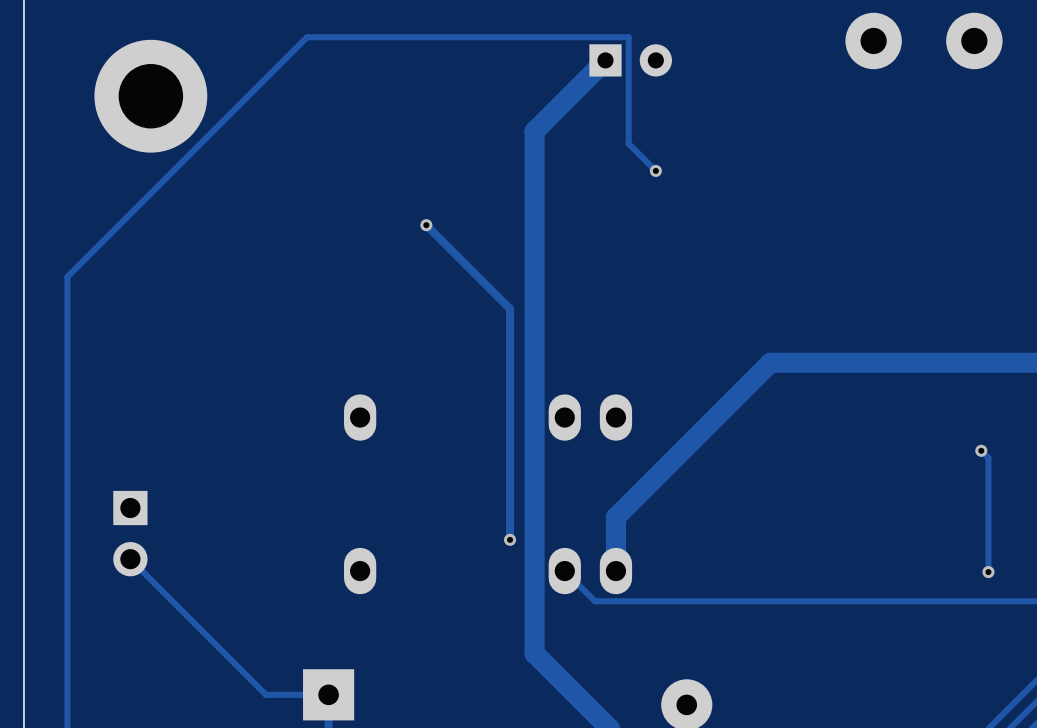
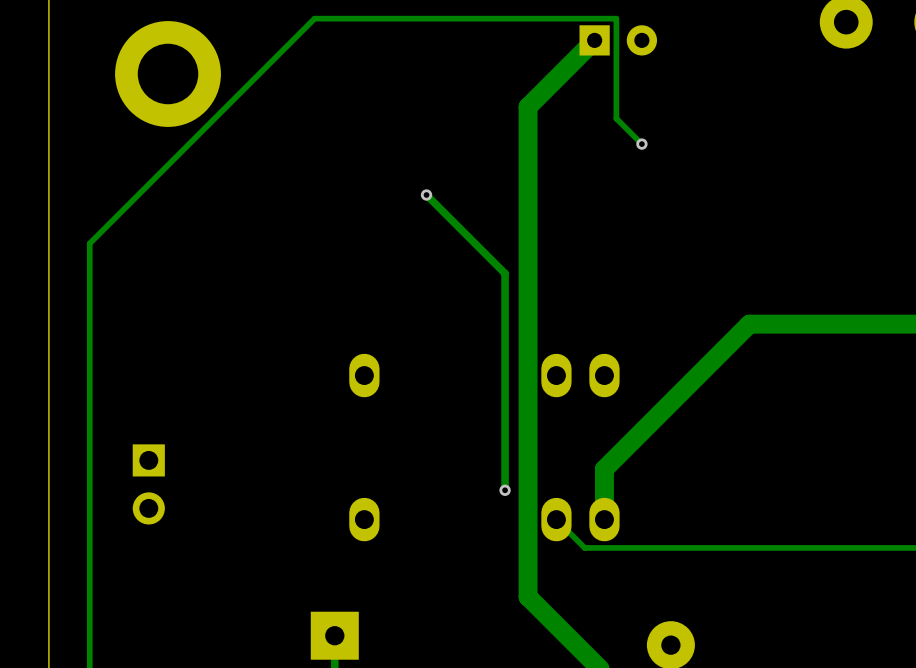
track: (130, 559) (266, 694) (328, 694) -> none

